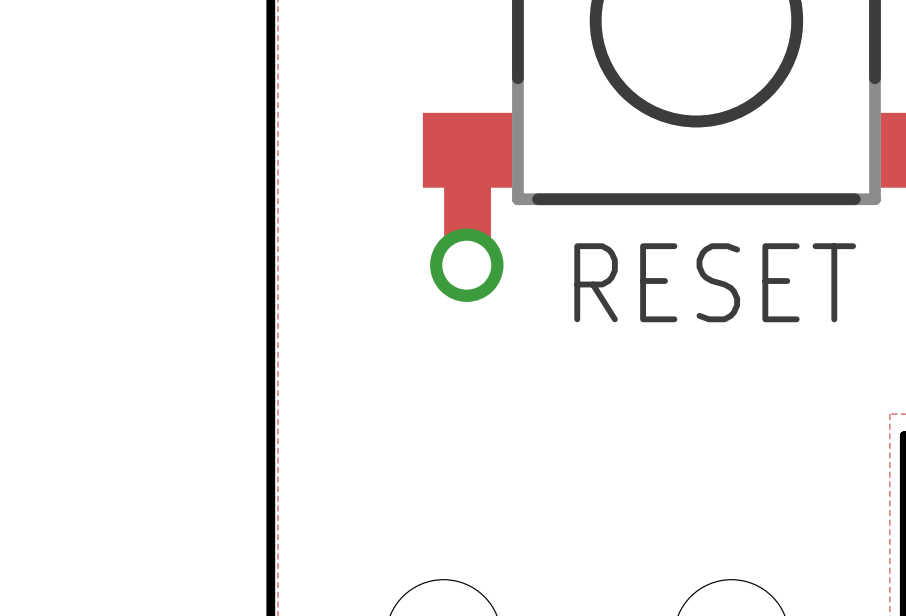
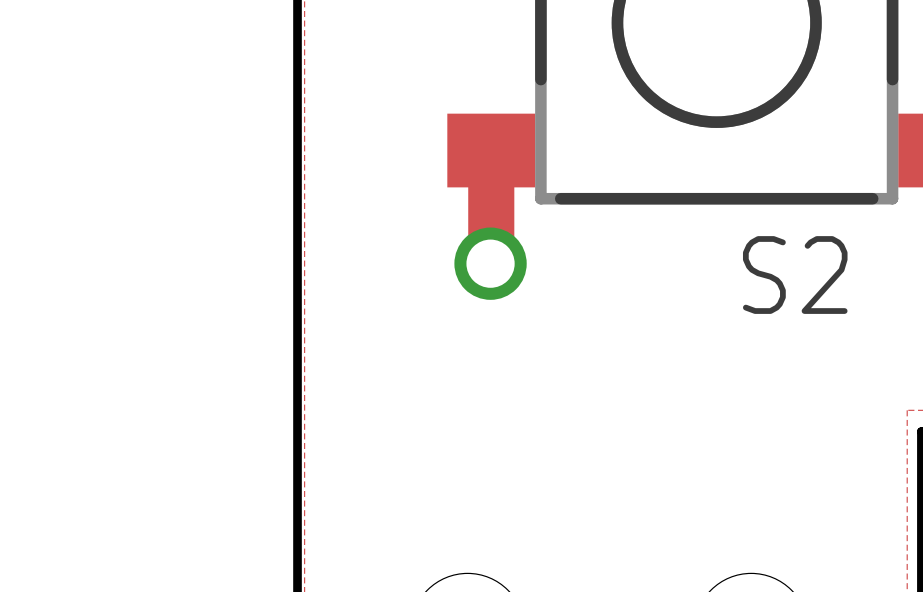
S2 name: none -> S2 (795, 275)
text: RESET (715, 282) -> none

